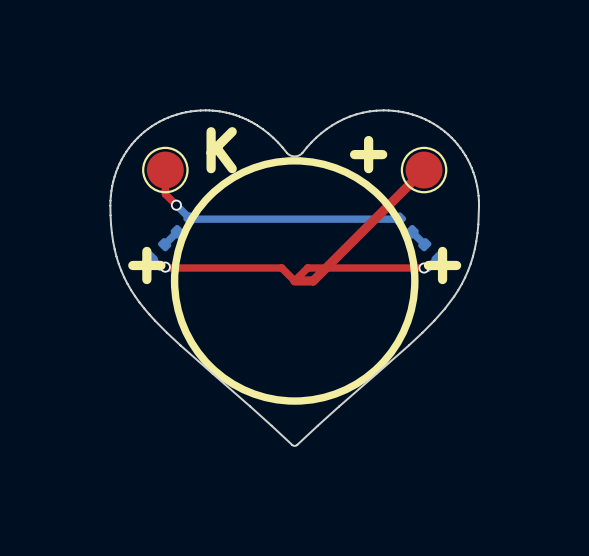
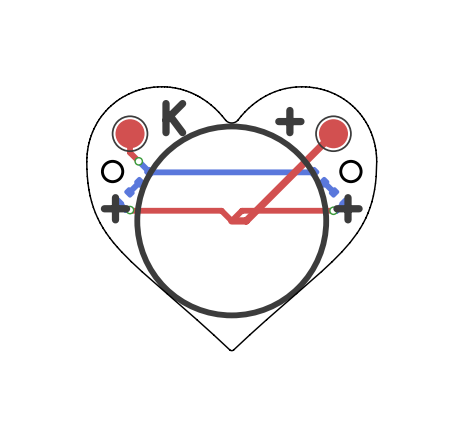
round board edge: none -> [100, 159, 125, 184]
round board edge: none -> [339, 159, 363, 184]

